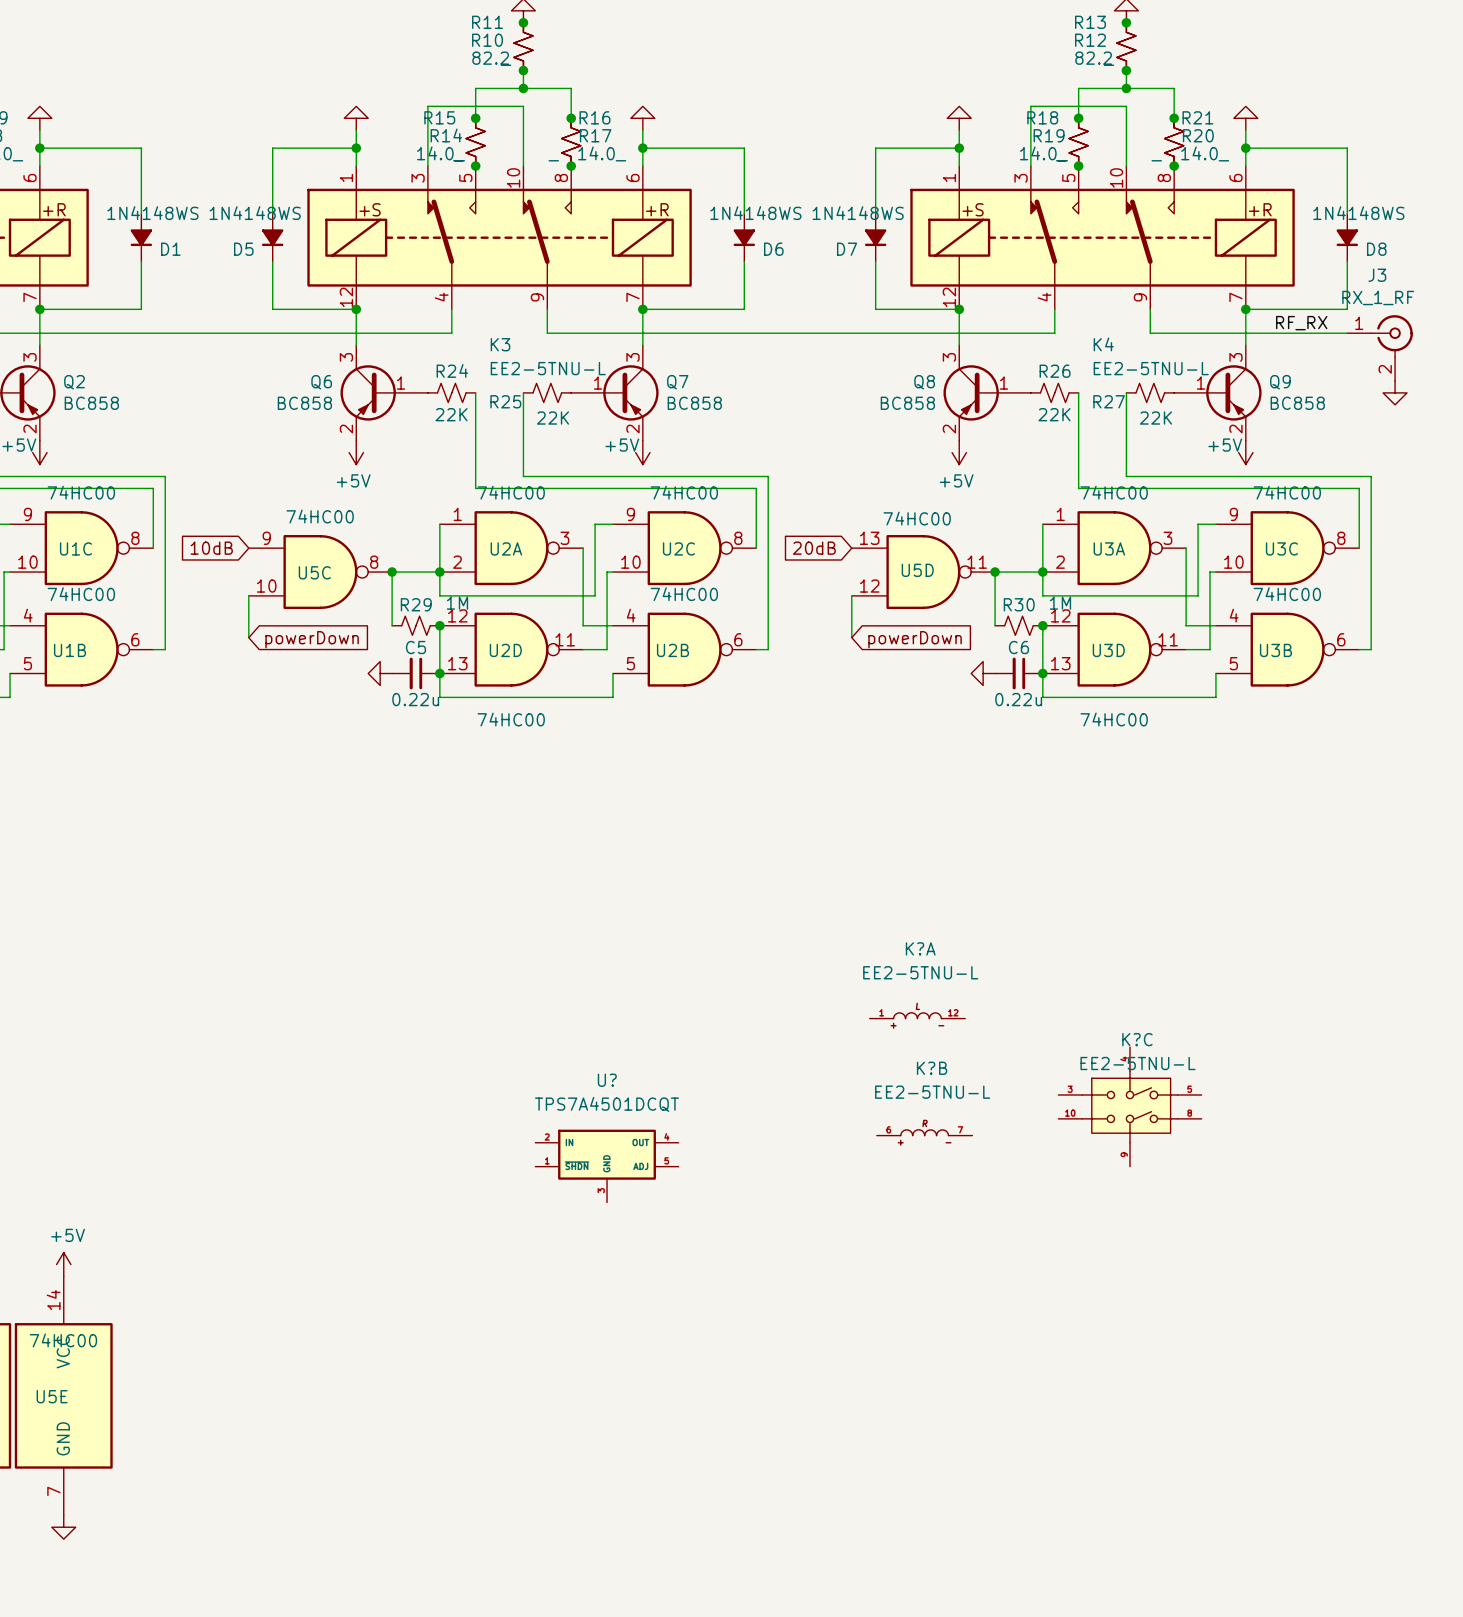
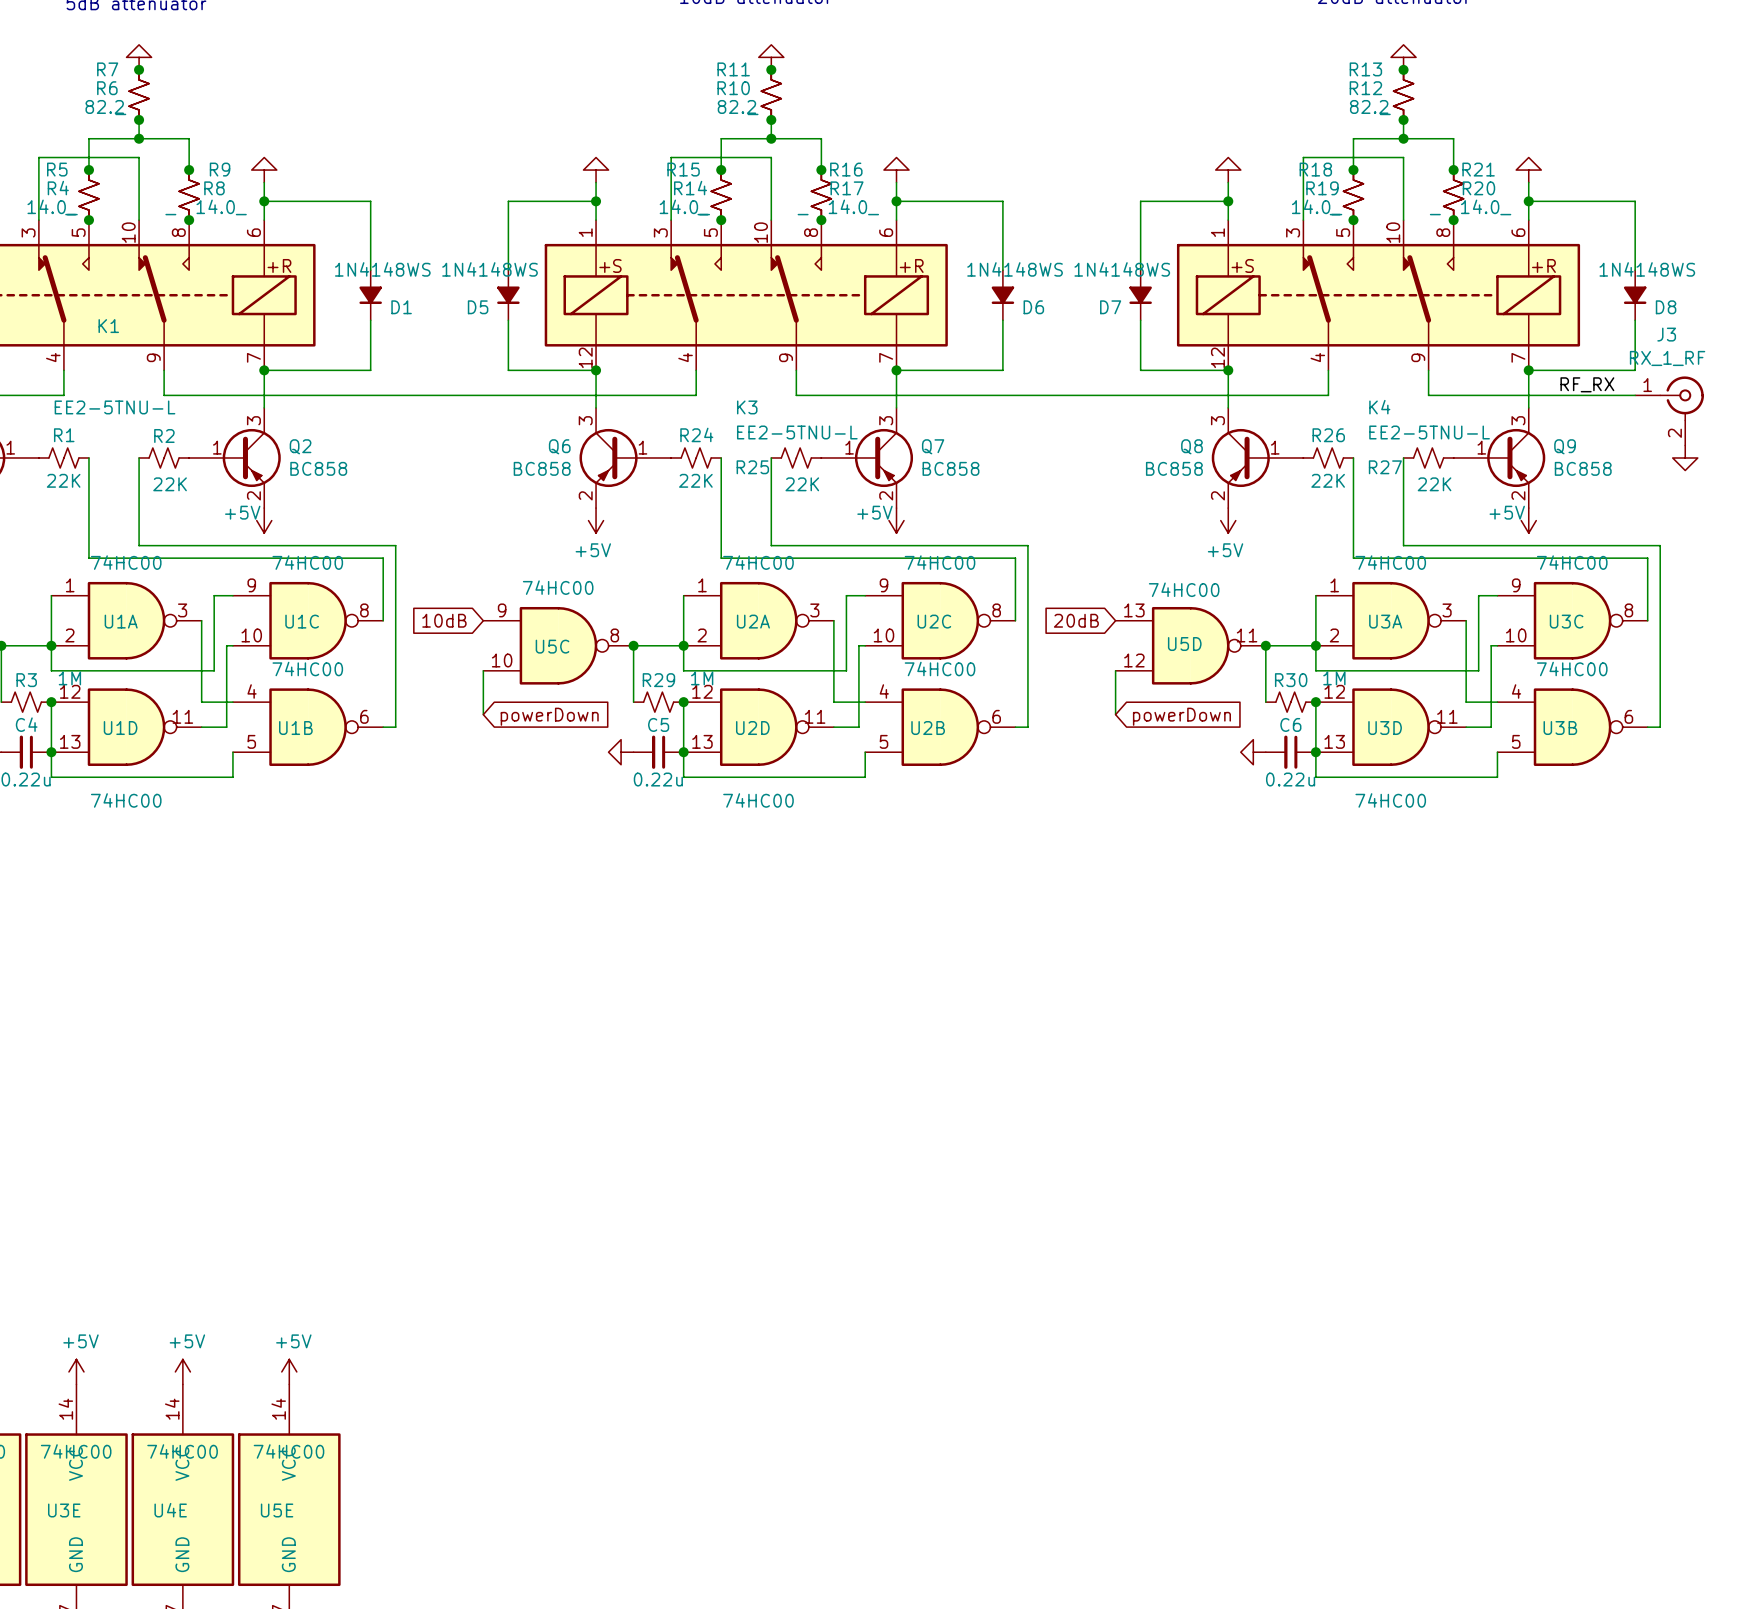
K?A: EE2-5TNU-L (917, 1027) -> none
K?C: EE2-5TNU-L (1129, 1106) -> none
K?B: EE2-5TNU-L (924, 1144) -> none
U?: TPS7A4501DCQT (607, 1166) -> none

